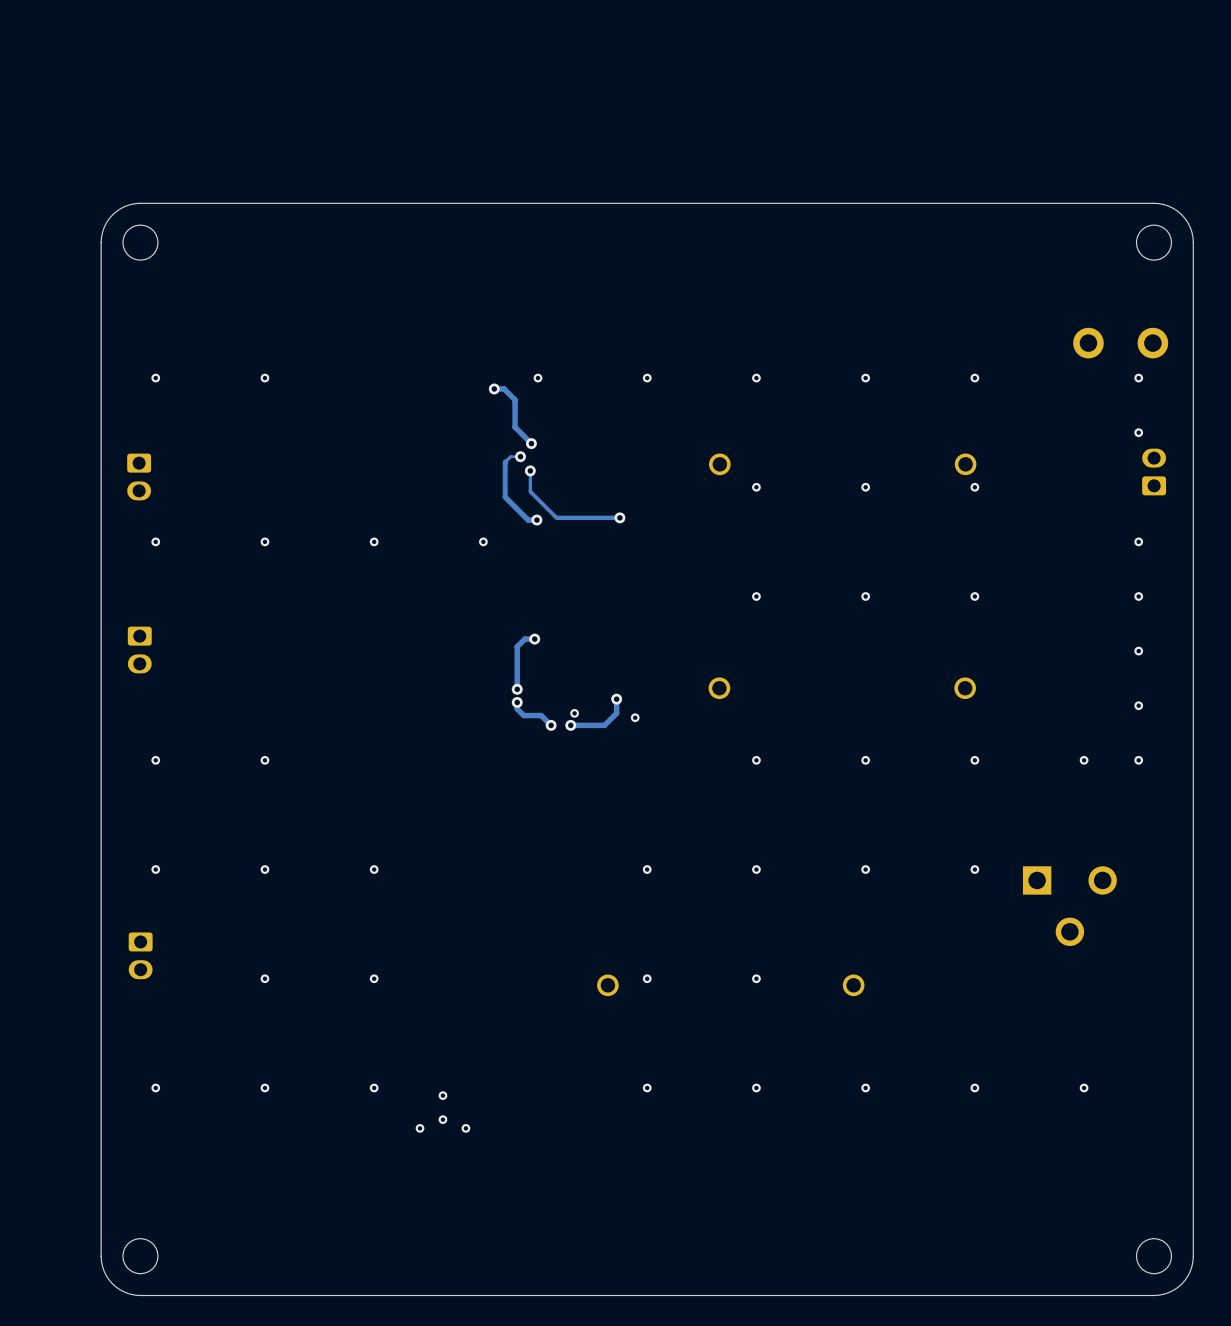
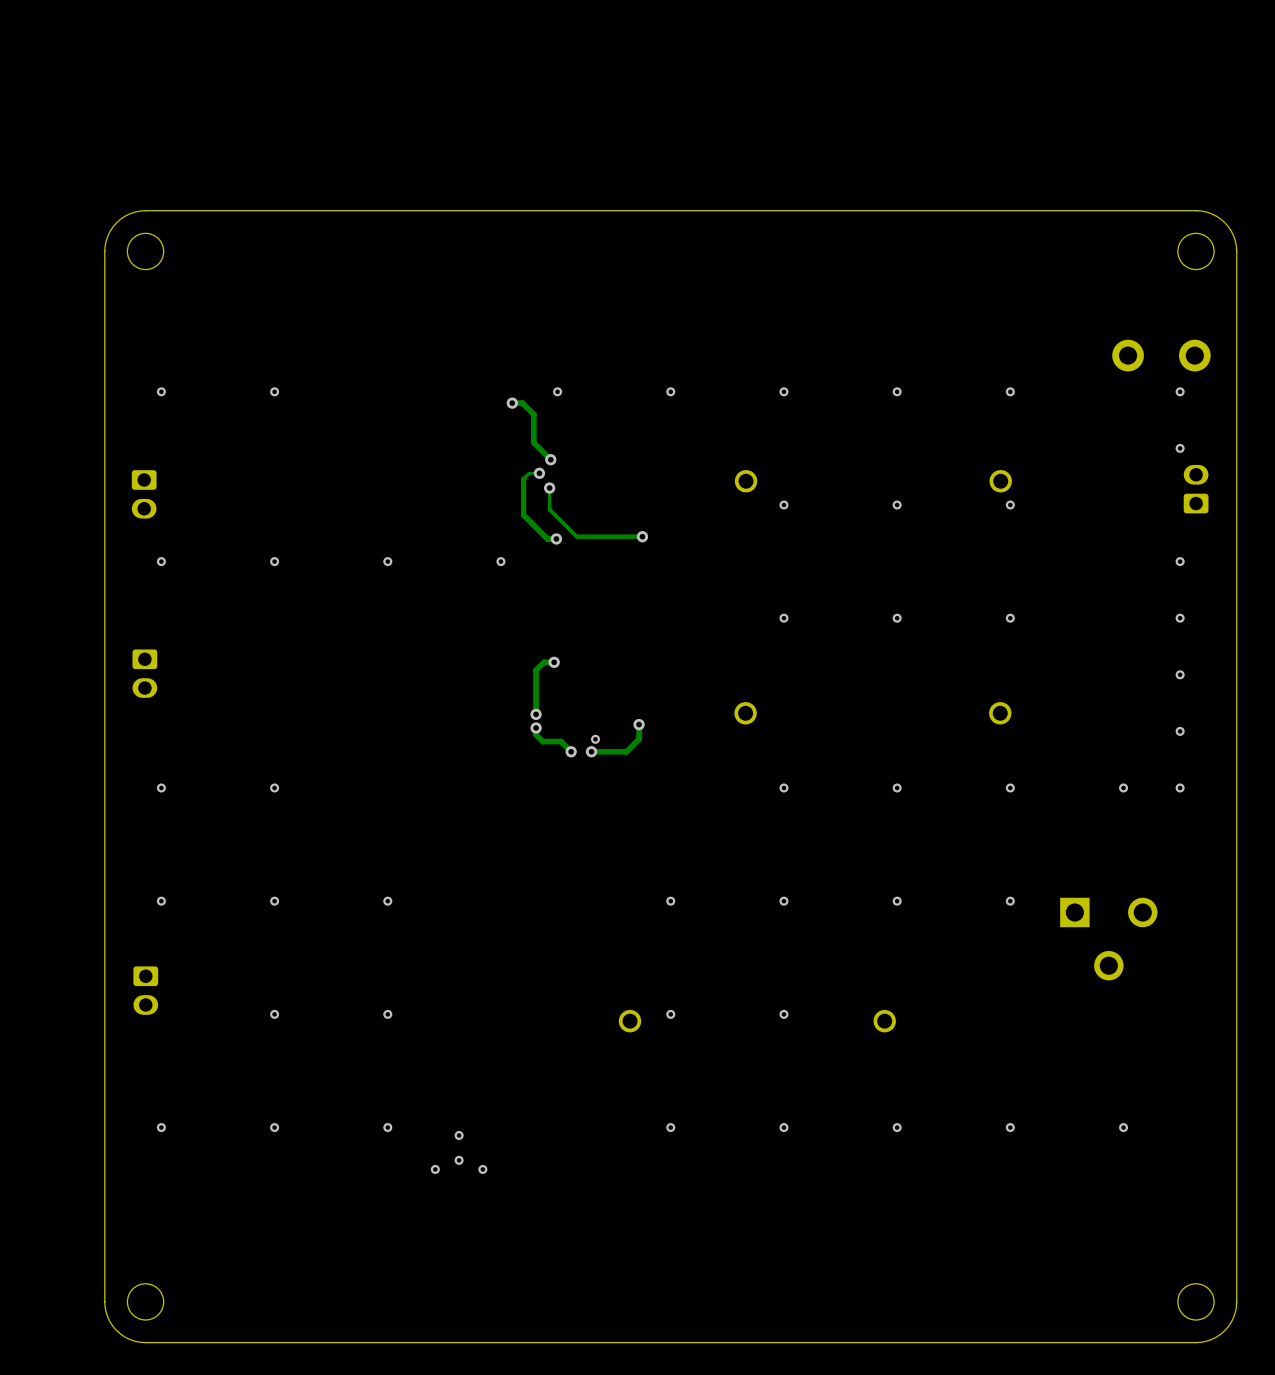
via: (635, 717) -> none

